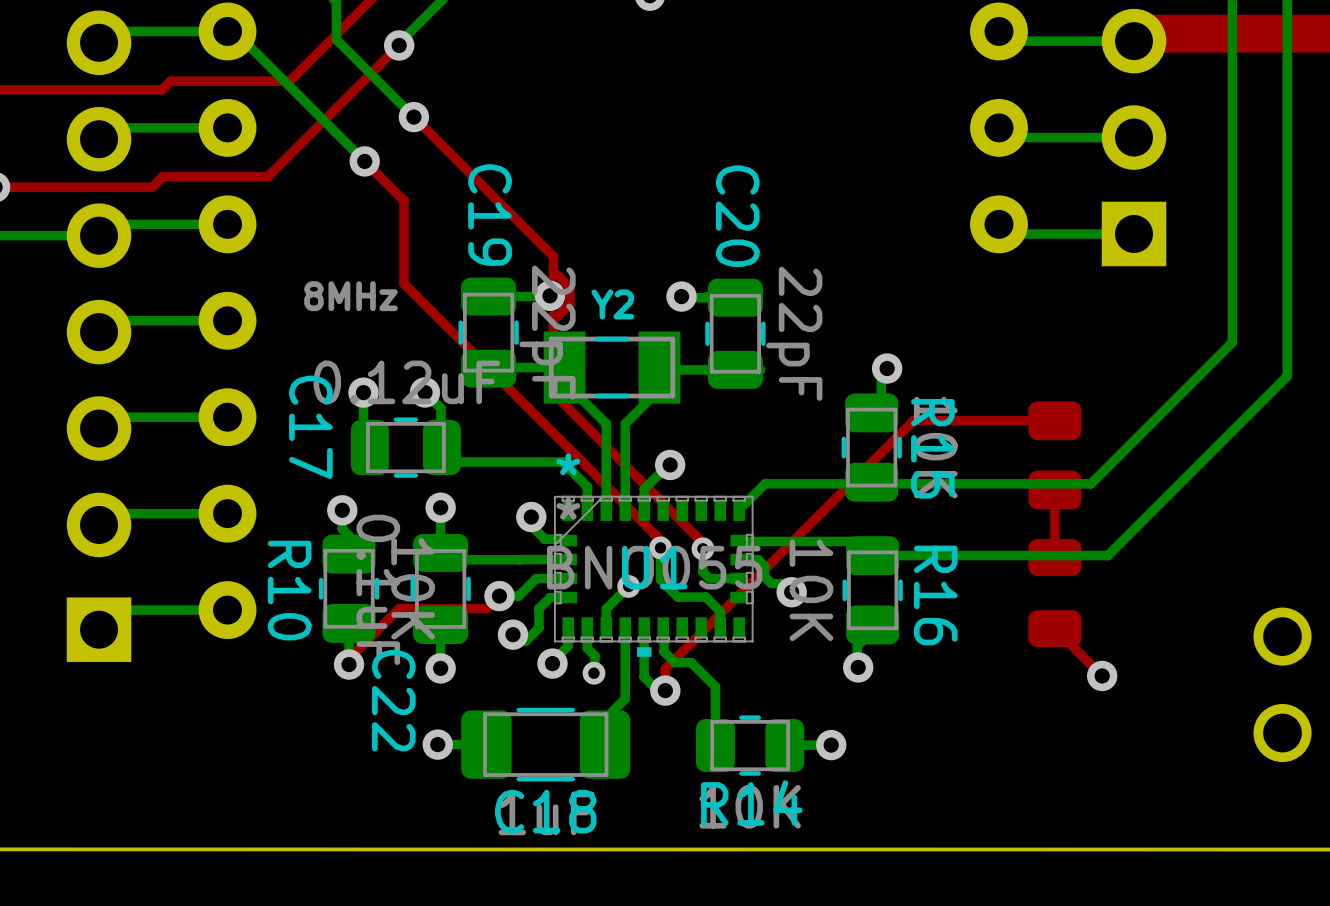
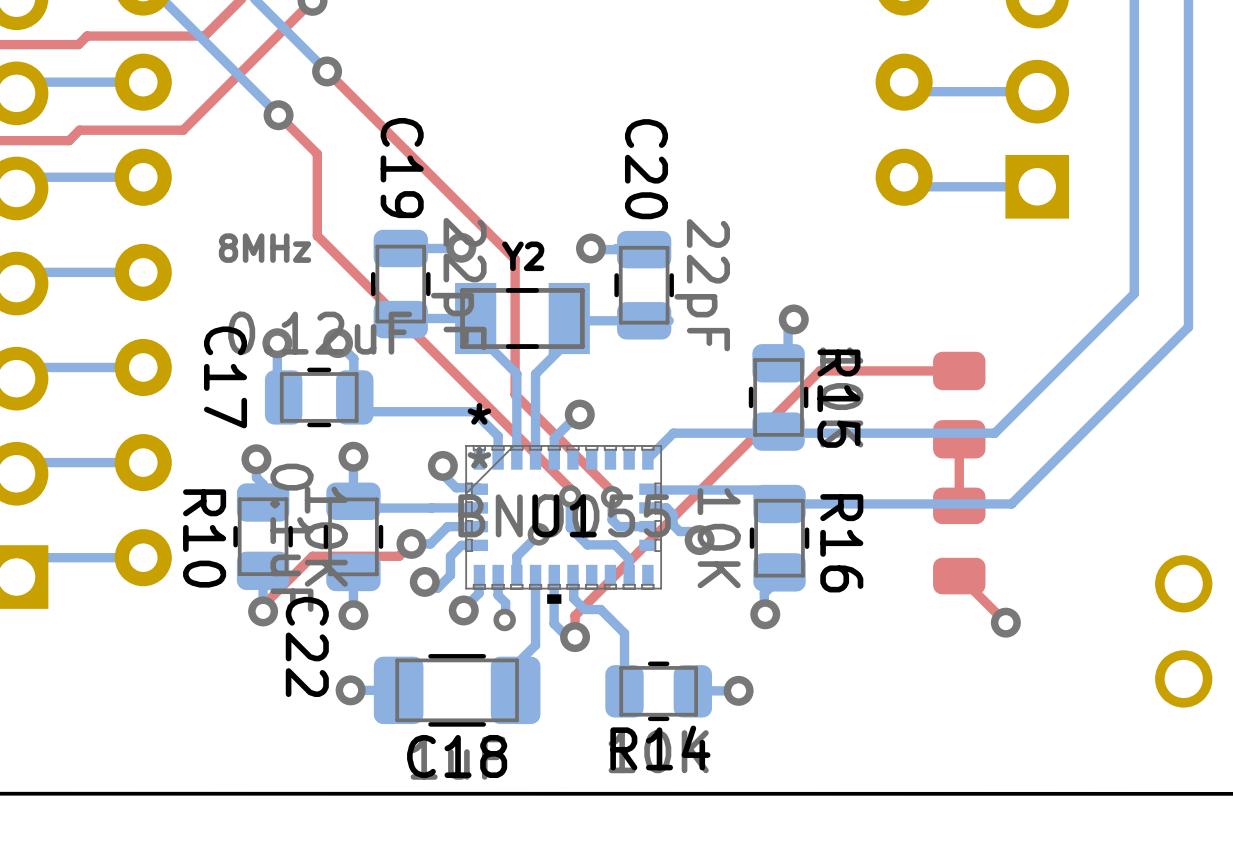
top track: (553, 256) (553, 275) (558, 275) (569, 287) (569, 304) (558, 315) (553, 315) (553, 393) (604, 444) -> (464, 209) (515, 259) (515, 394)

